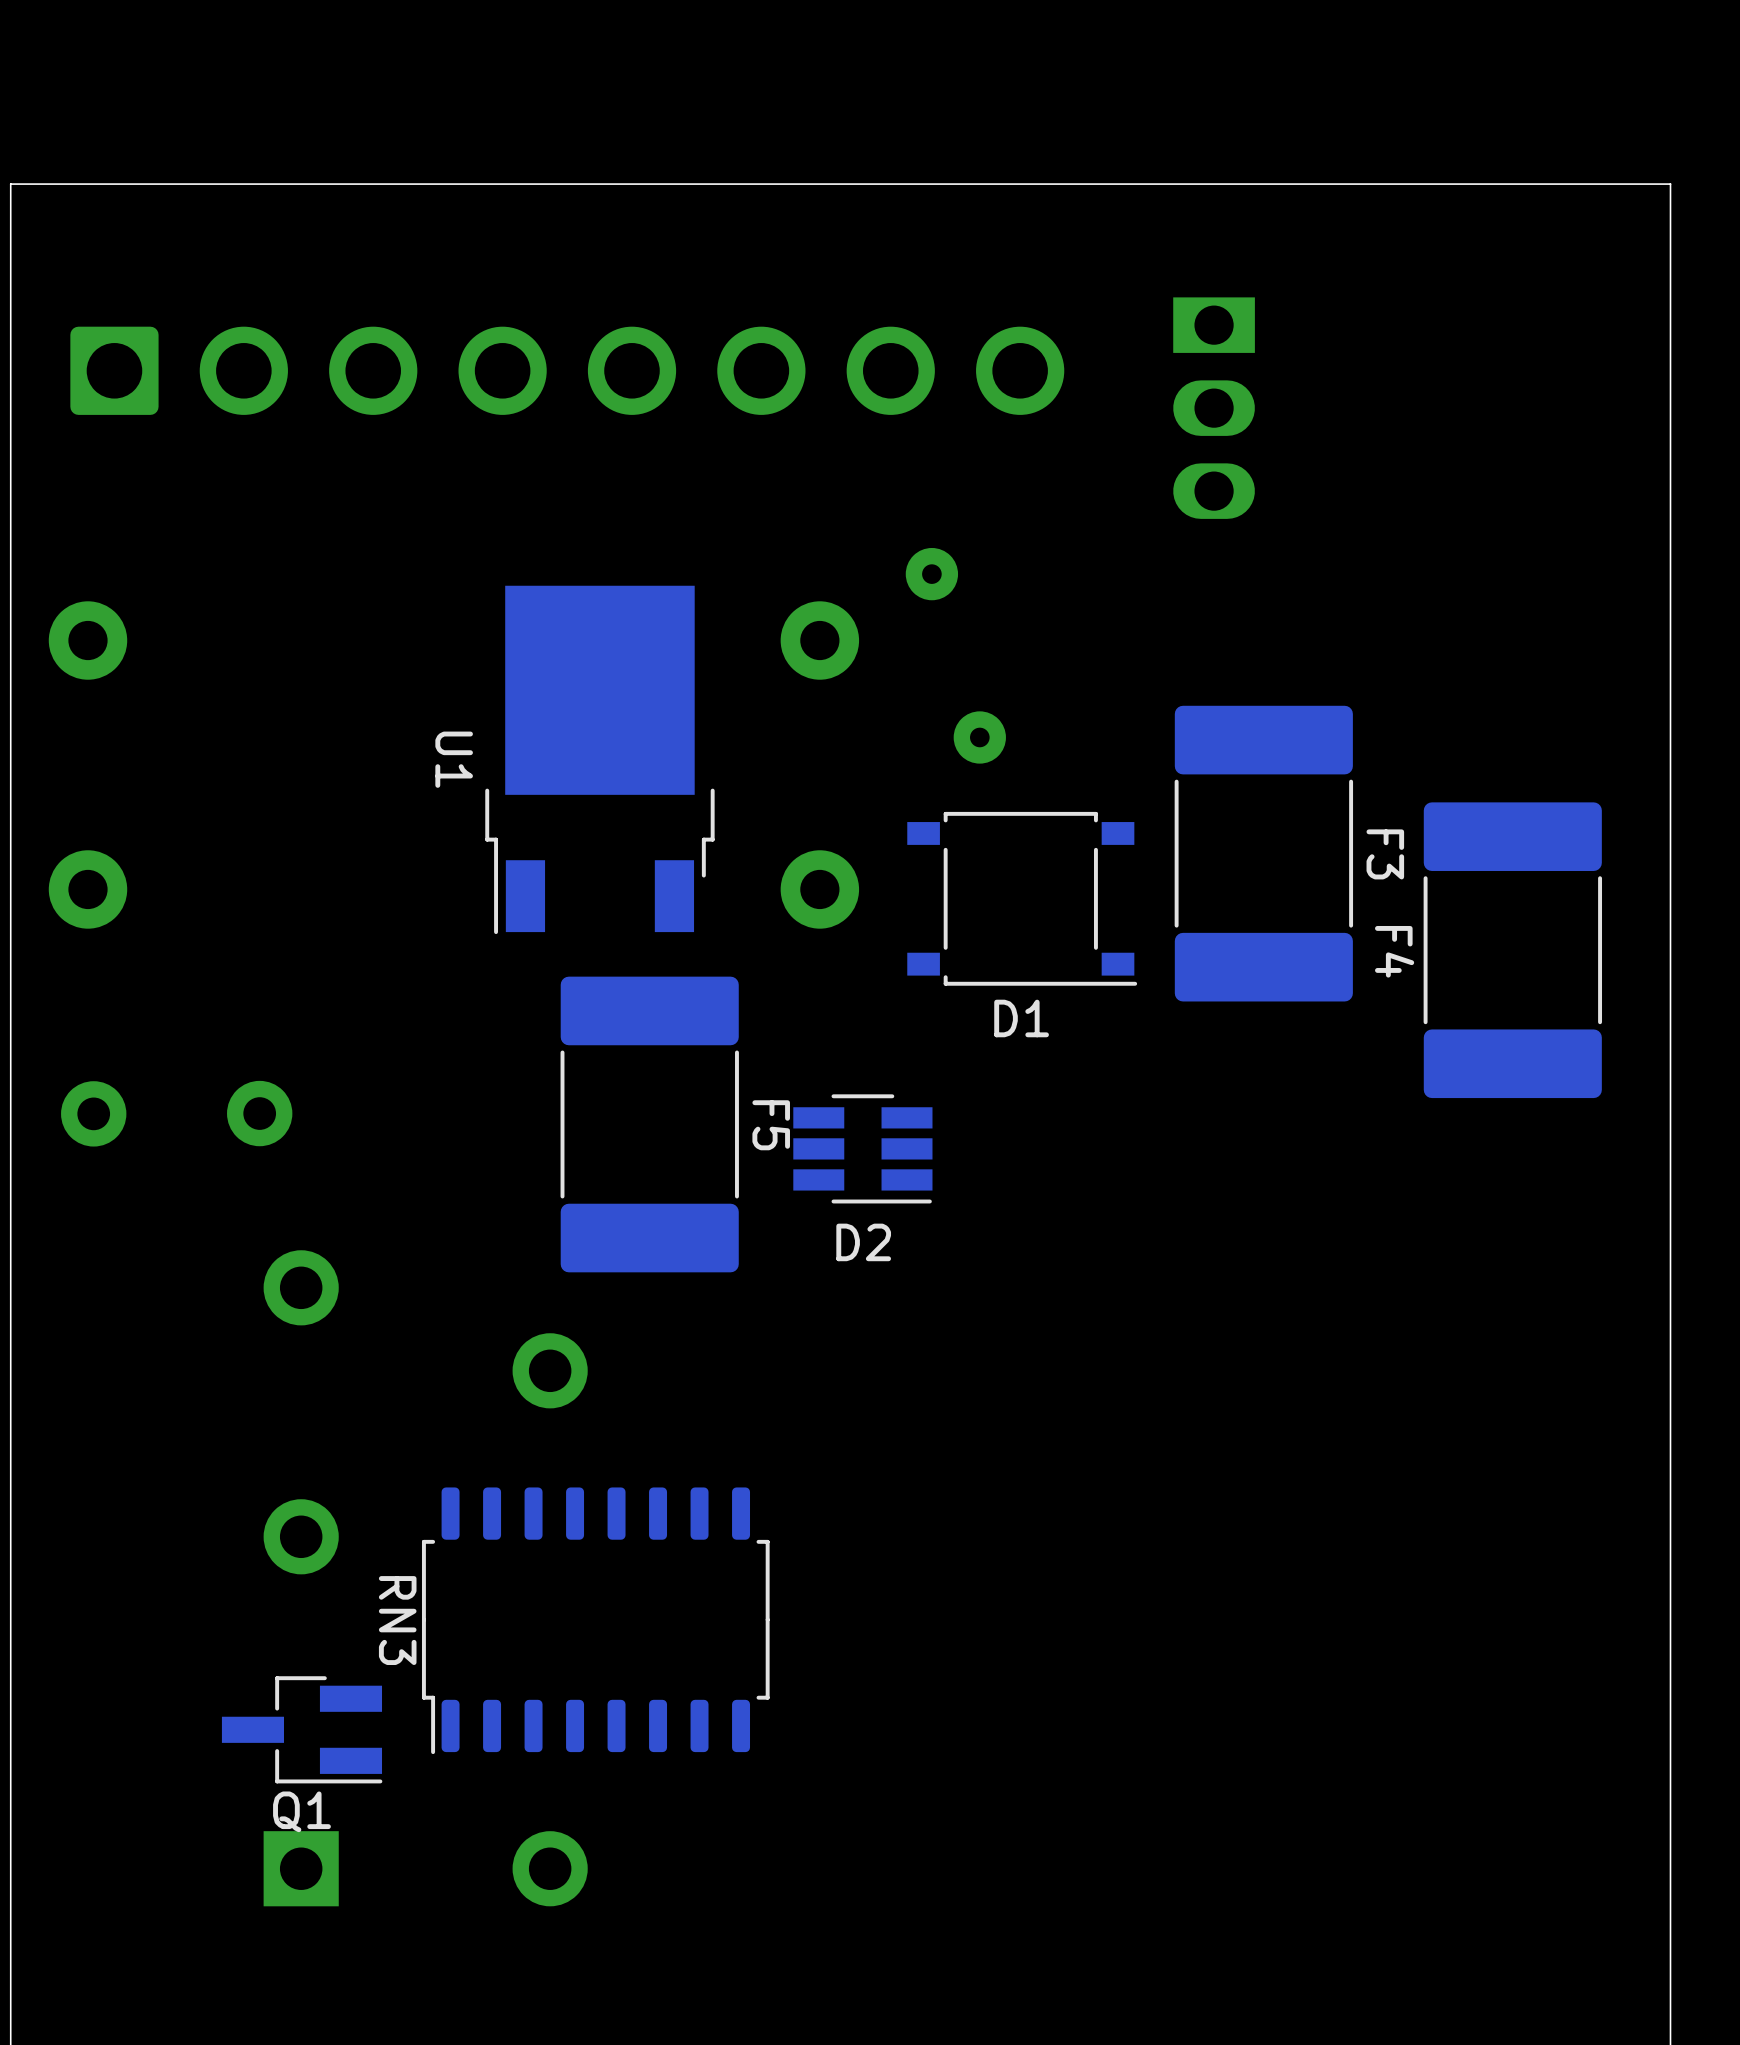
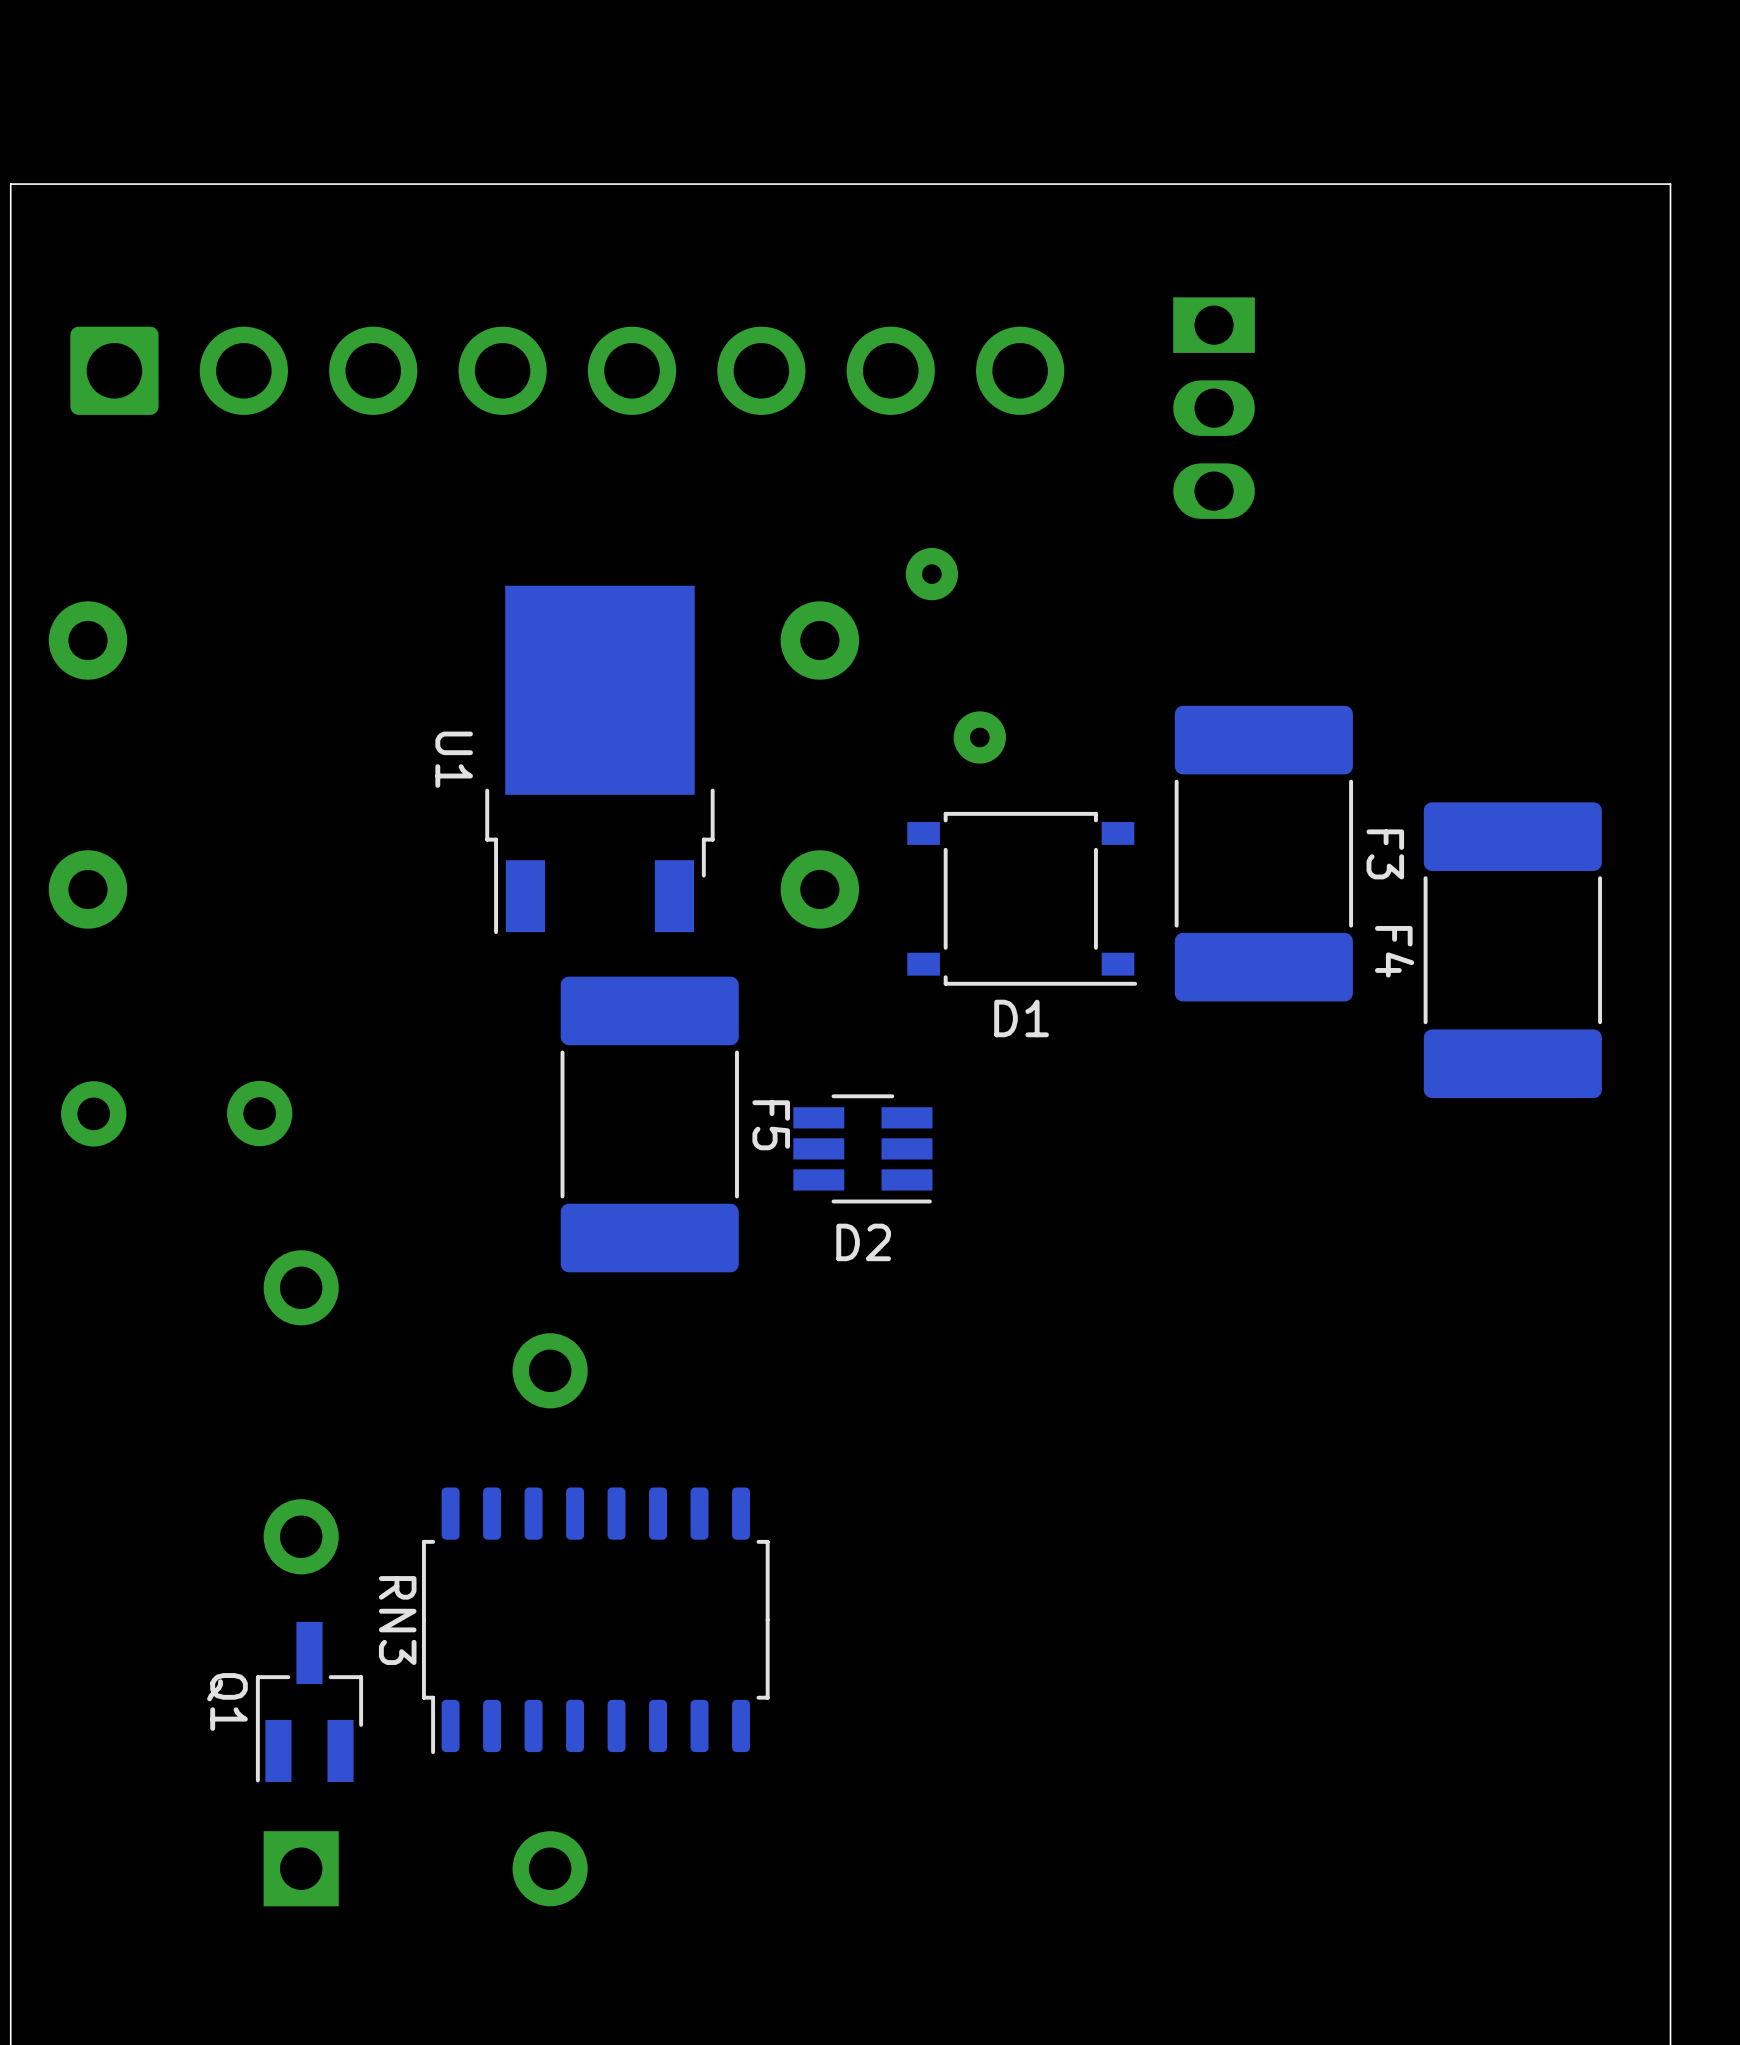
Q1 rotation: 0° (302, 1729) -> 90° clockwise (309, 1702)

